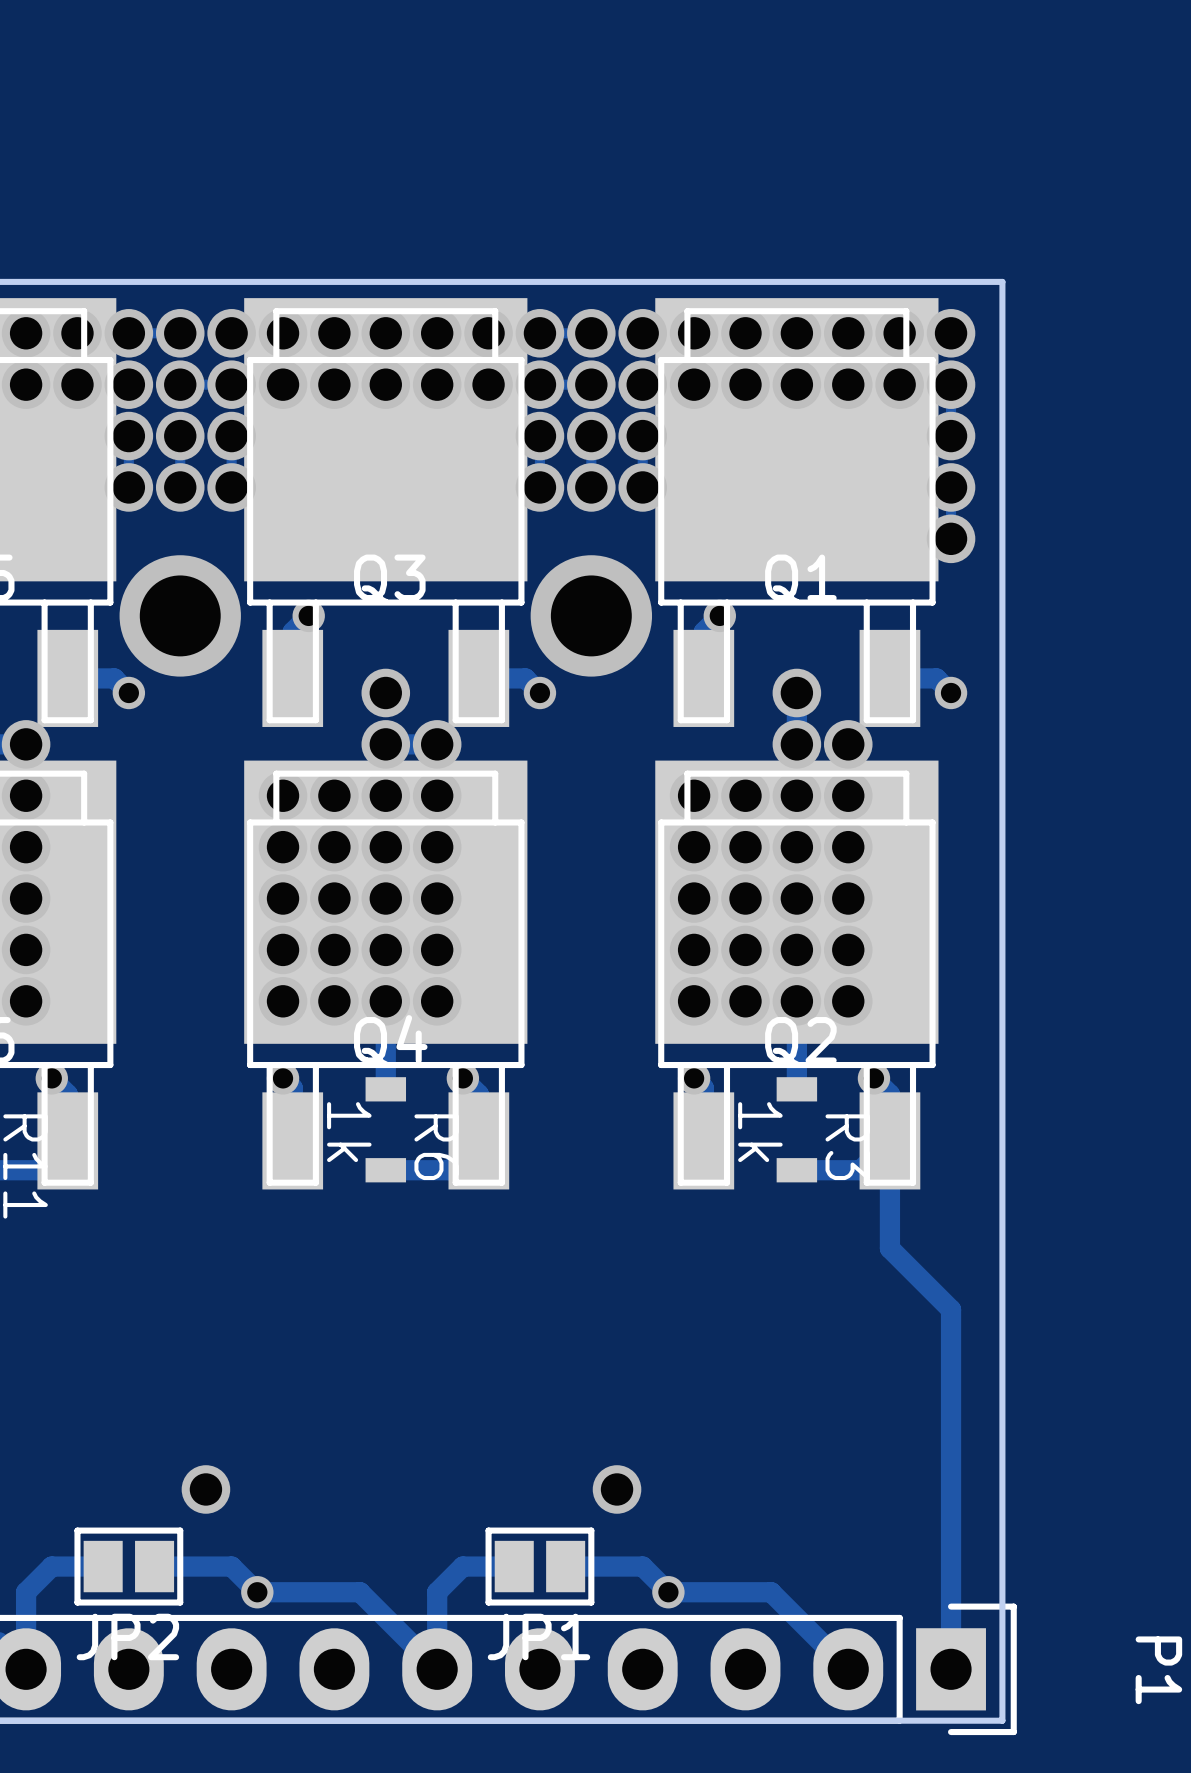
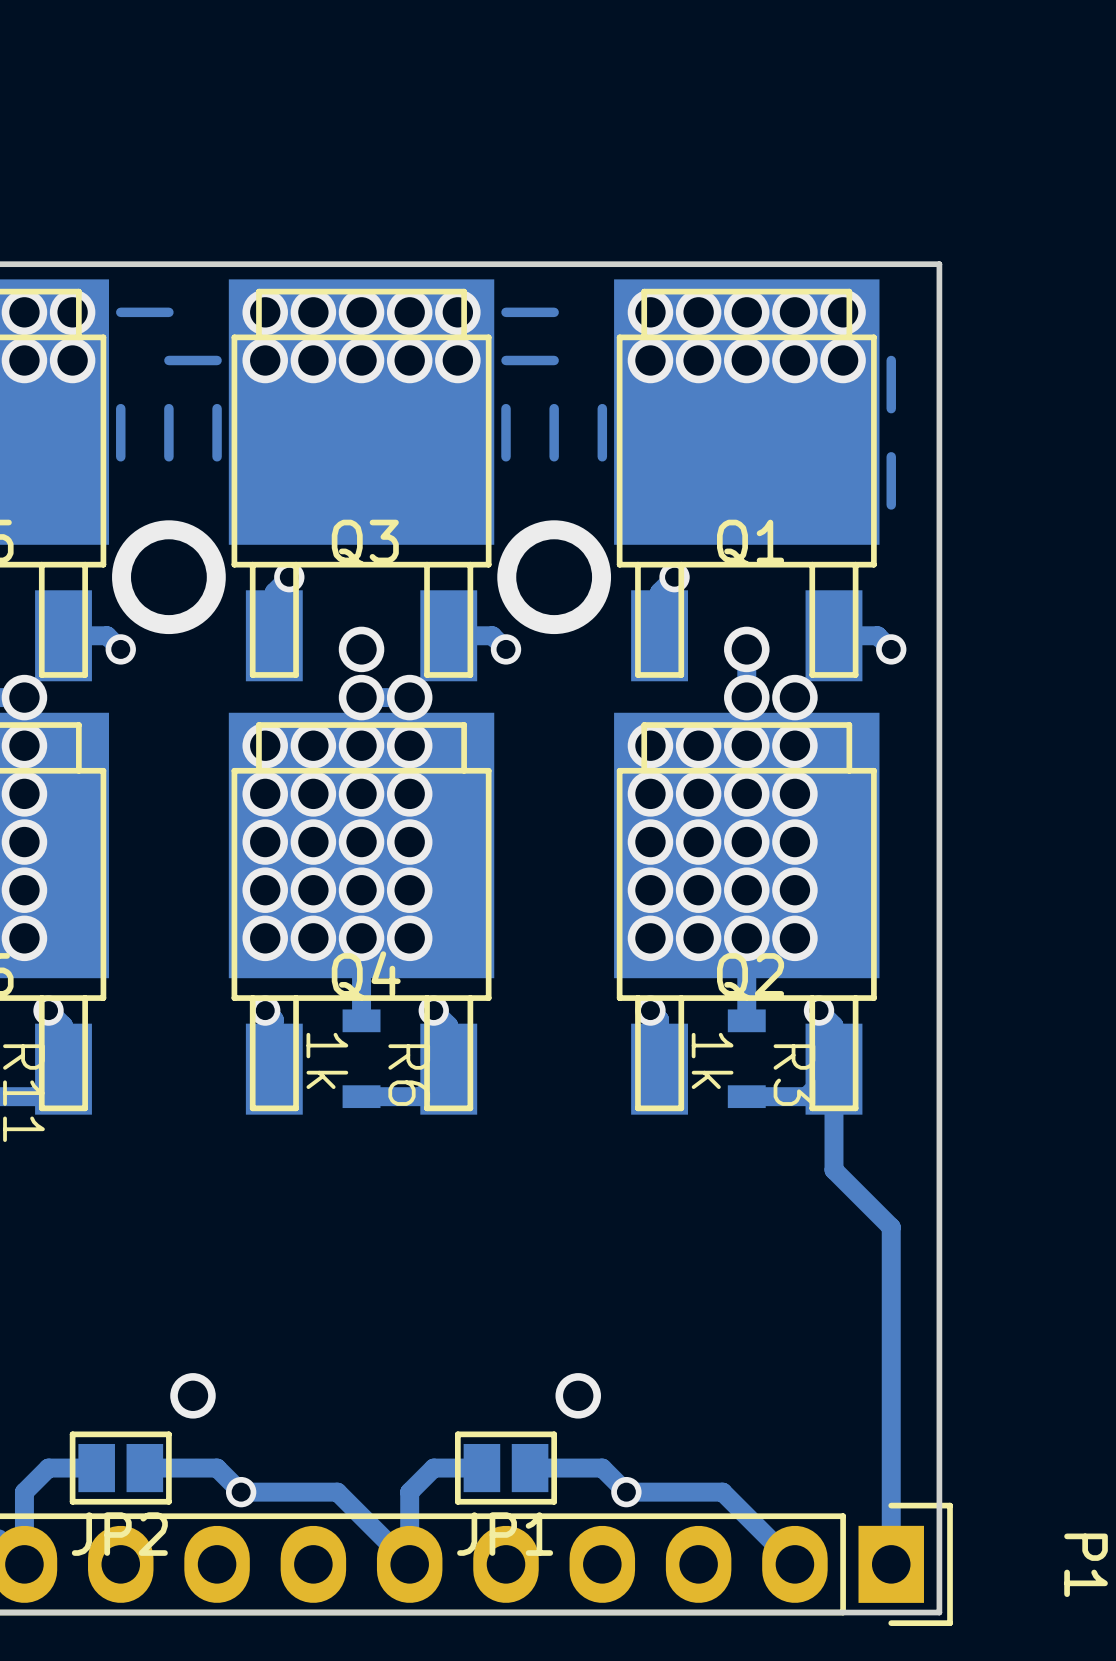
via: (128, 333) -> none
via: (180, 333) -> none
via: (231, 333) -> none
via: (539, 333) -> none
via: (591, 333) -> none
via: (642, 333) -> none
via: (951, 333) -> none
via: (128, 384) -> none
via: (180, 384) -> none
via: (231, 384) -> none
via: (539, 384) -> none
via: (591, 384) -> none
via: (642, 384) -> none
via: (951, 384) -> none
via: (128, 436) -> none
via: (180, 436) -> none
via: (231, 436) -> none
via: (539, 436) -> none
via: (591, 436) -> none
via: (642, 436) -> none
via: (951, 436) -> none
via: (128, 487) -> none
via: (180, 487) -> none
via: (231, 487) -> none
via: (539, 487) -> none
via: (591, 487) -> none
via: (642, 487) -> none
via: (951, 487) -> none
via: (951, 538) -> none

